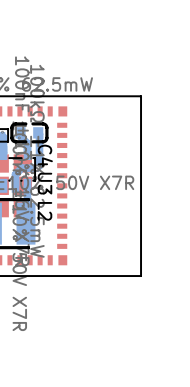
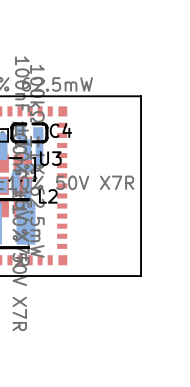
C4 name rotation: 0° (45, 155) -> 90° counterclockwise (60, 130)
U3 name rotation: 0° (45, 183) -> 90° counterclockwise (50, 158)
L2 name rotation: 0° (45, 211) -> 90° counterclockwise (48, 196)

